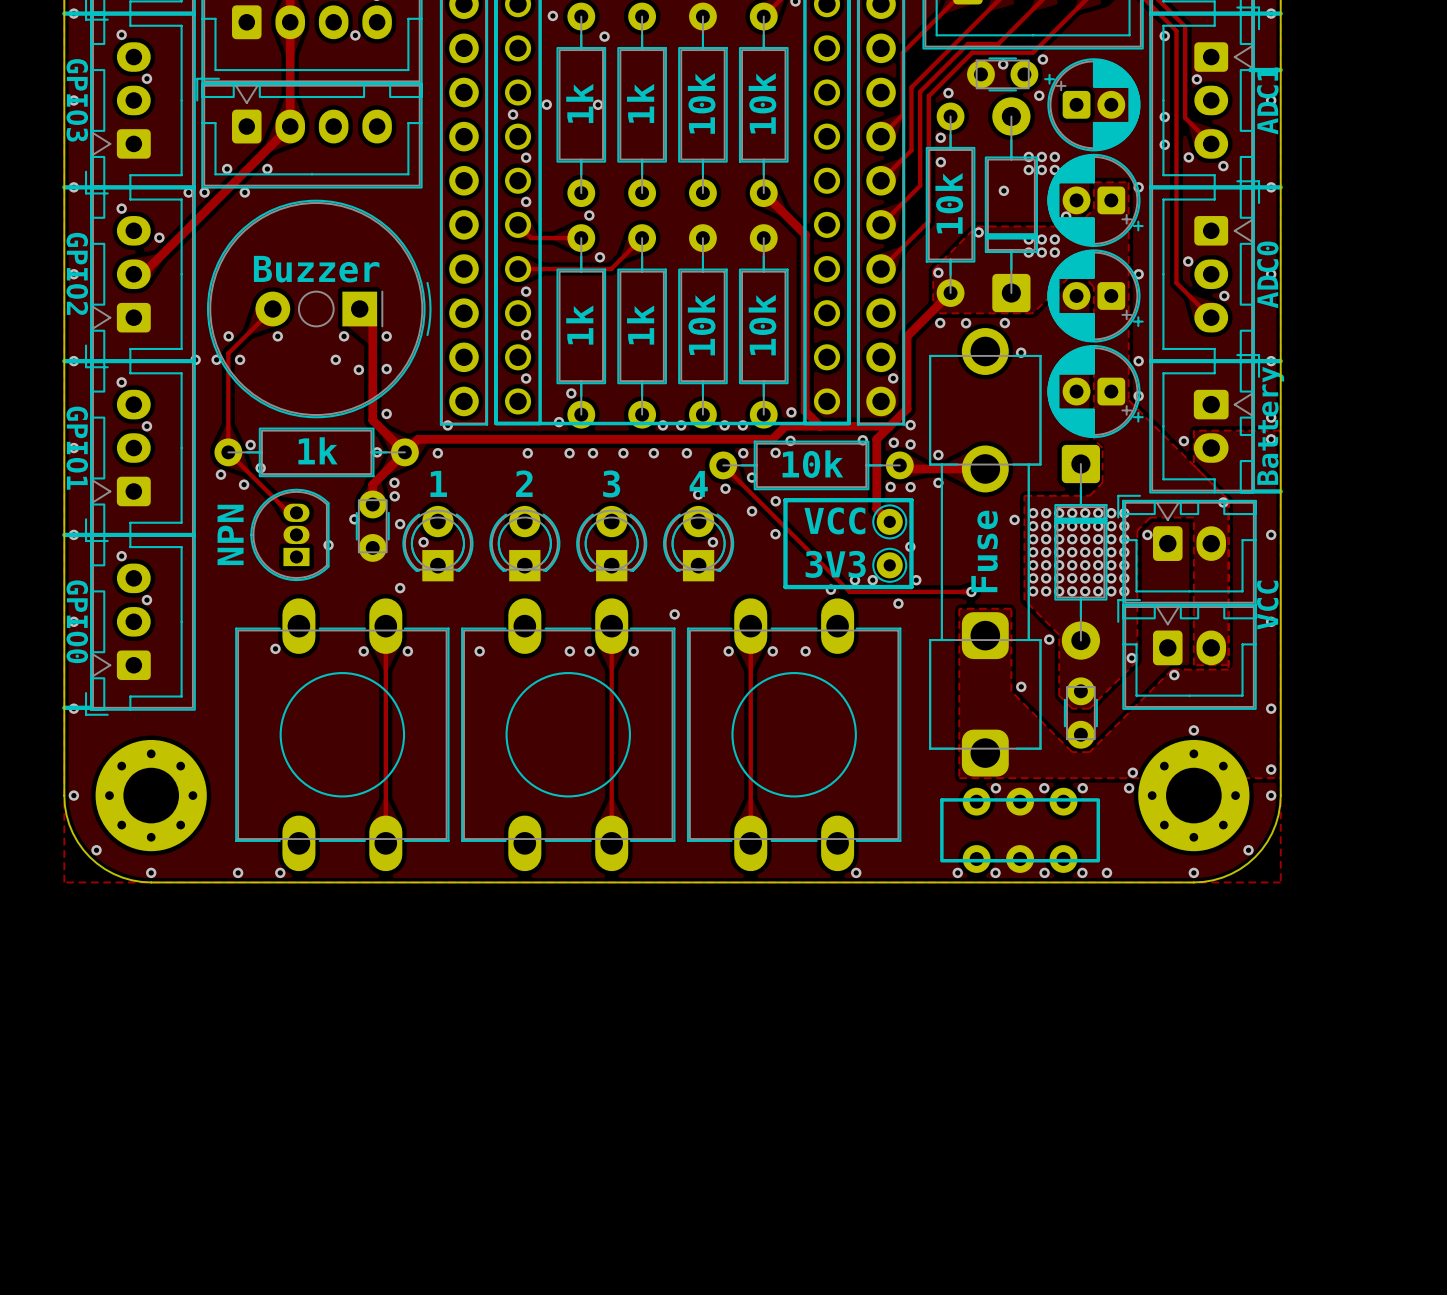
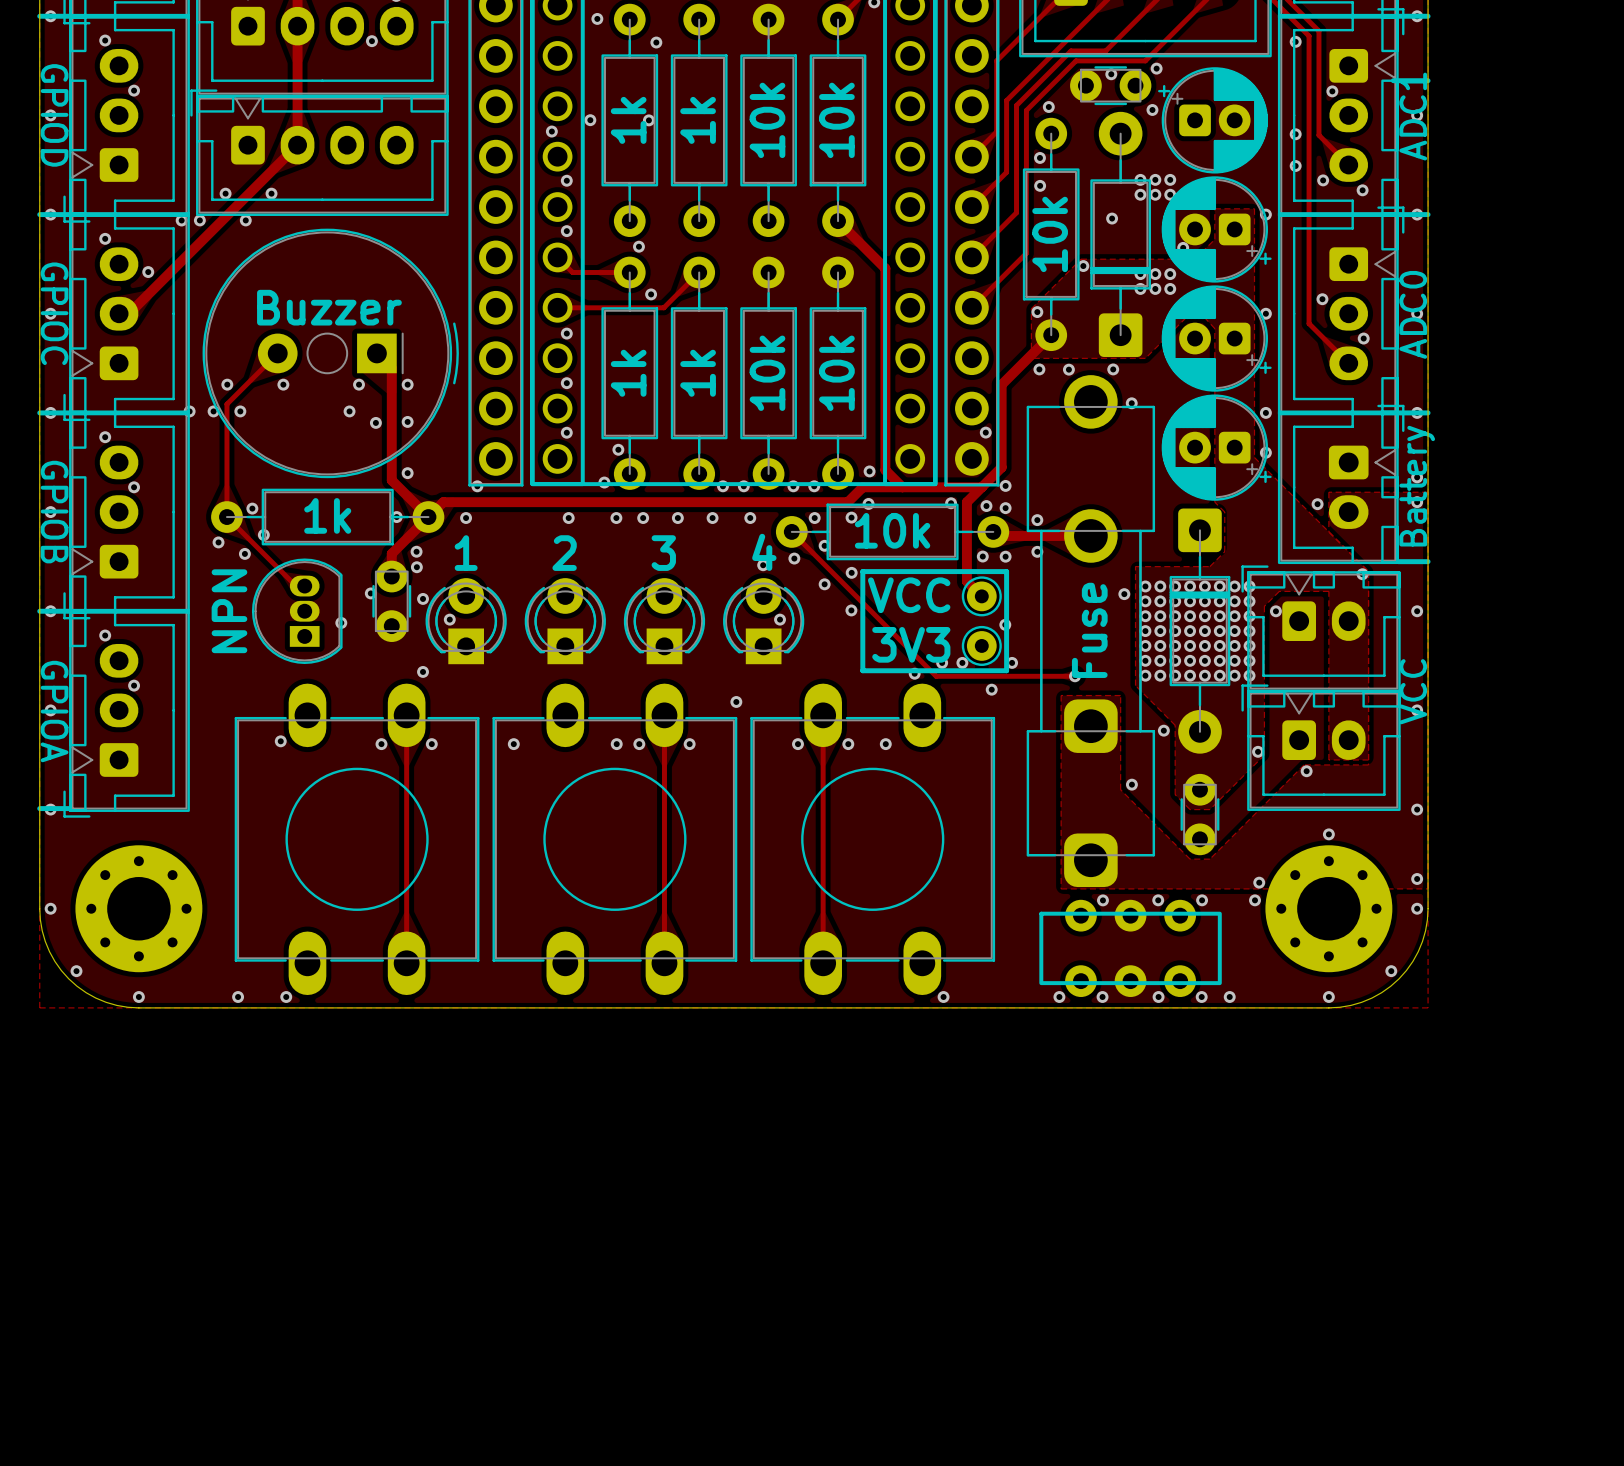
text: GPIO3 (77, 100) -> GPIOD (54, 115)
text: GPIO2 (77, 273) -> GPIOC (54, 313)
text: GPIO1 (77, 448) -> GPIOB (54, 512)
text: GPIO0 (77, 621) -> GPIOA (54, 711)

